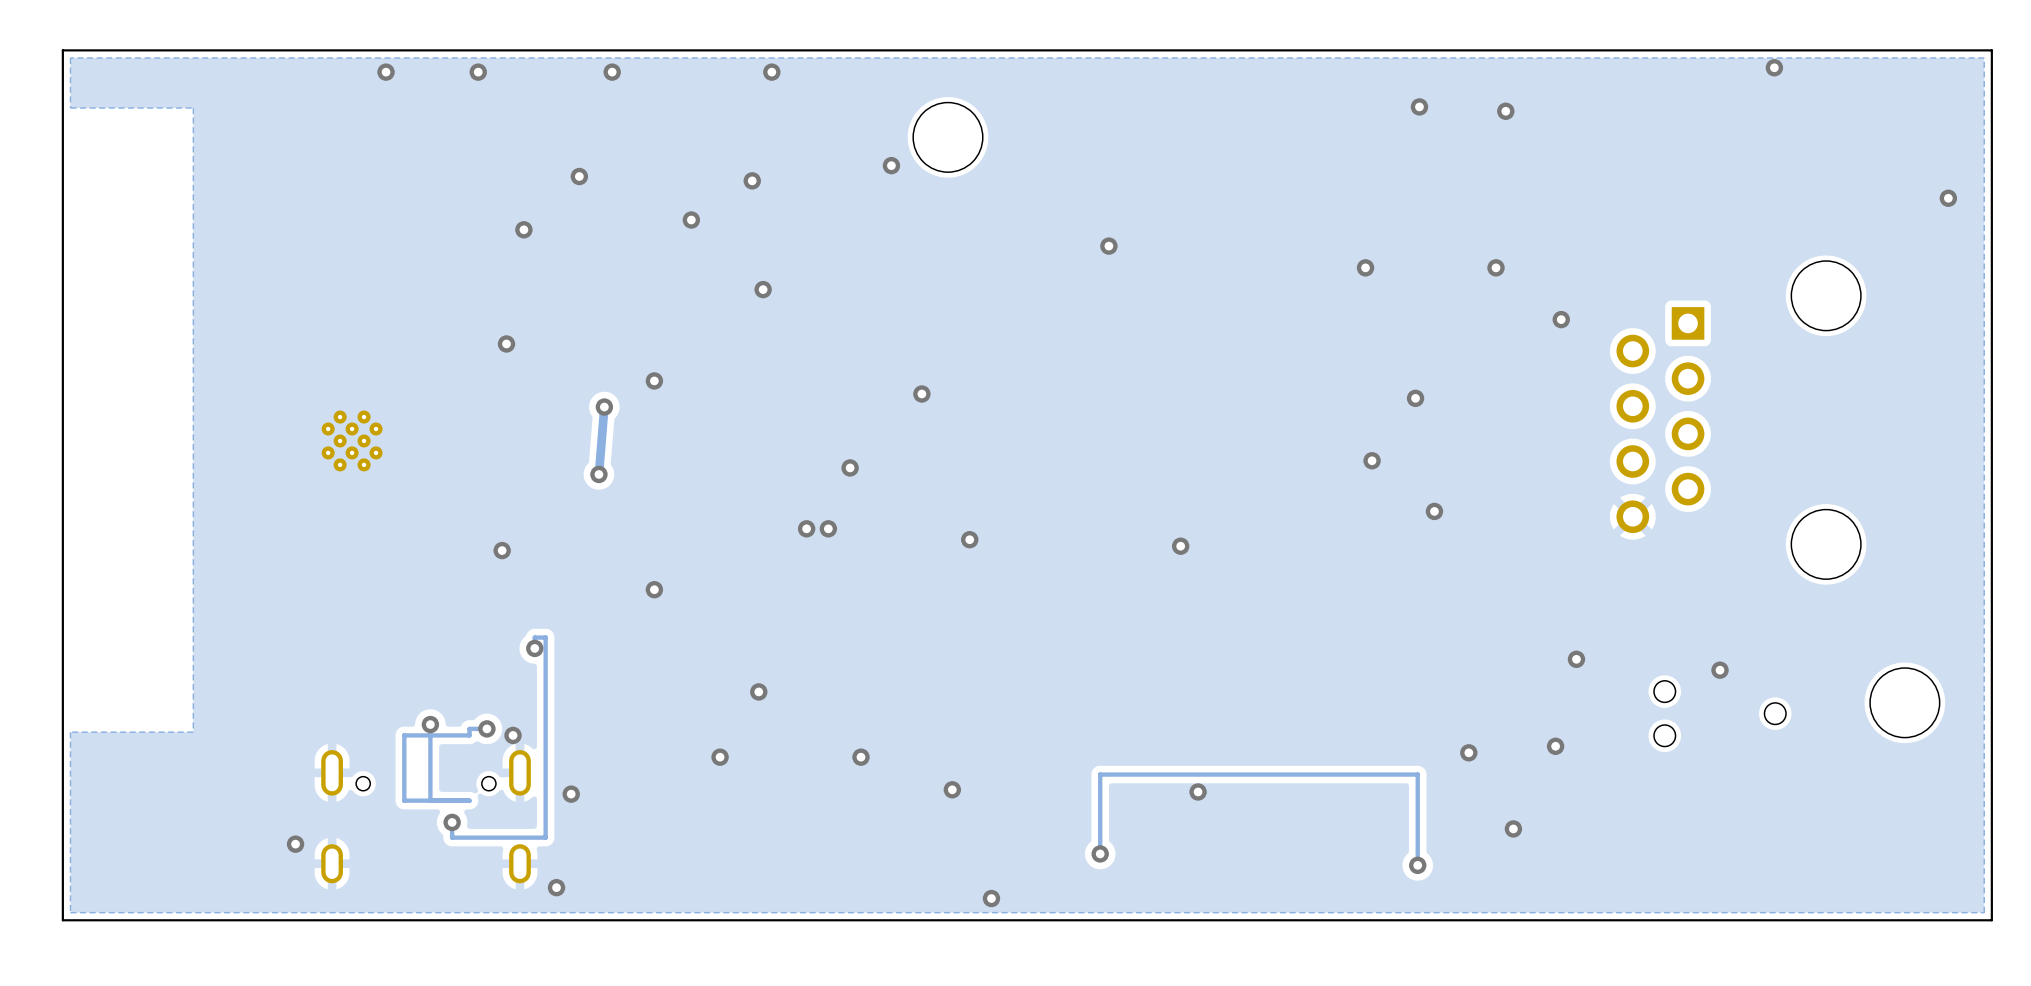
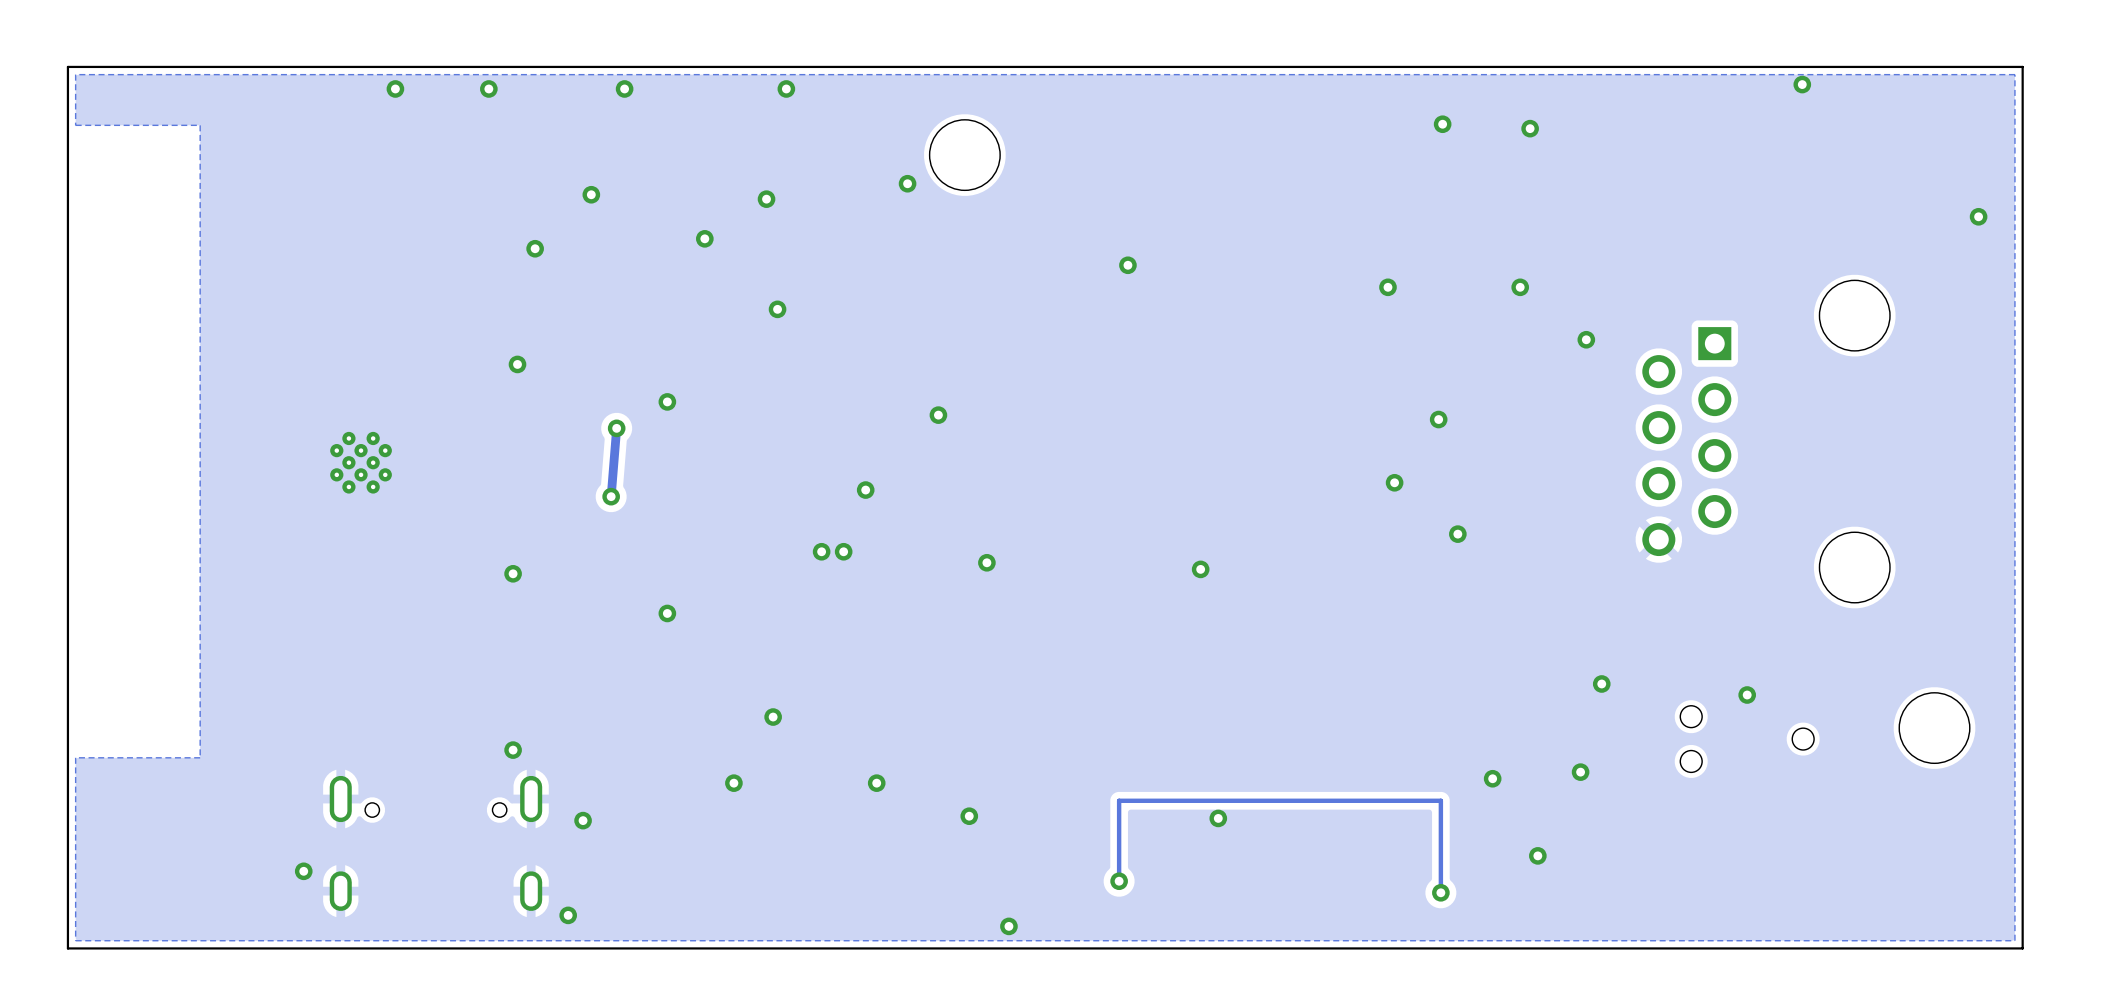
track: (534, 648) (534, 637) (545, 637) (545, 837) (452, 837) (452, 822) -> none
via: (534, 648) -> none
track: (430, 724) (430, 800) -> none
via: (430, 724) -> none
via: none -> (513, 750)
track: (486, 728) (469, 728) (469, 735) (404, 735) (404, 800) (469, 800) -> none
via: (486, 728) -> none
via: (513, 735) -> none
via: (452, 822) -> none

